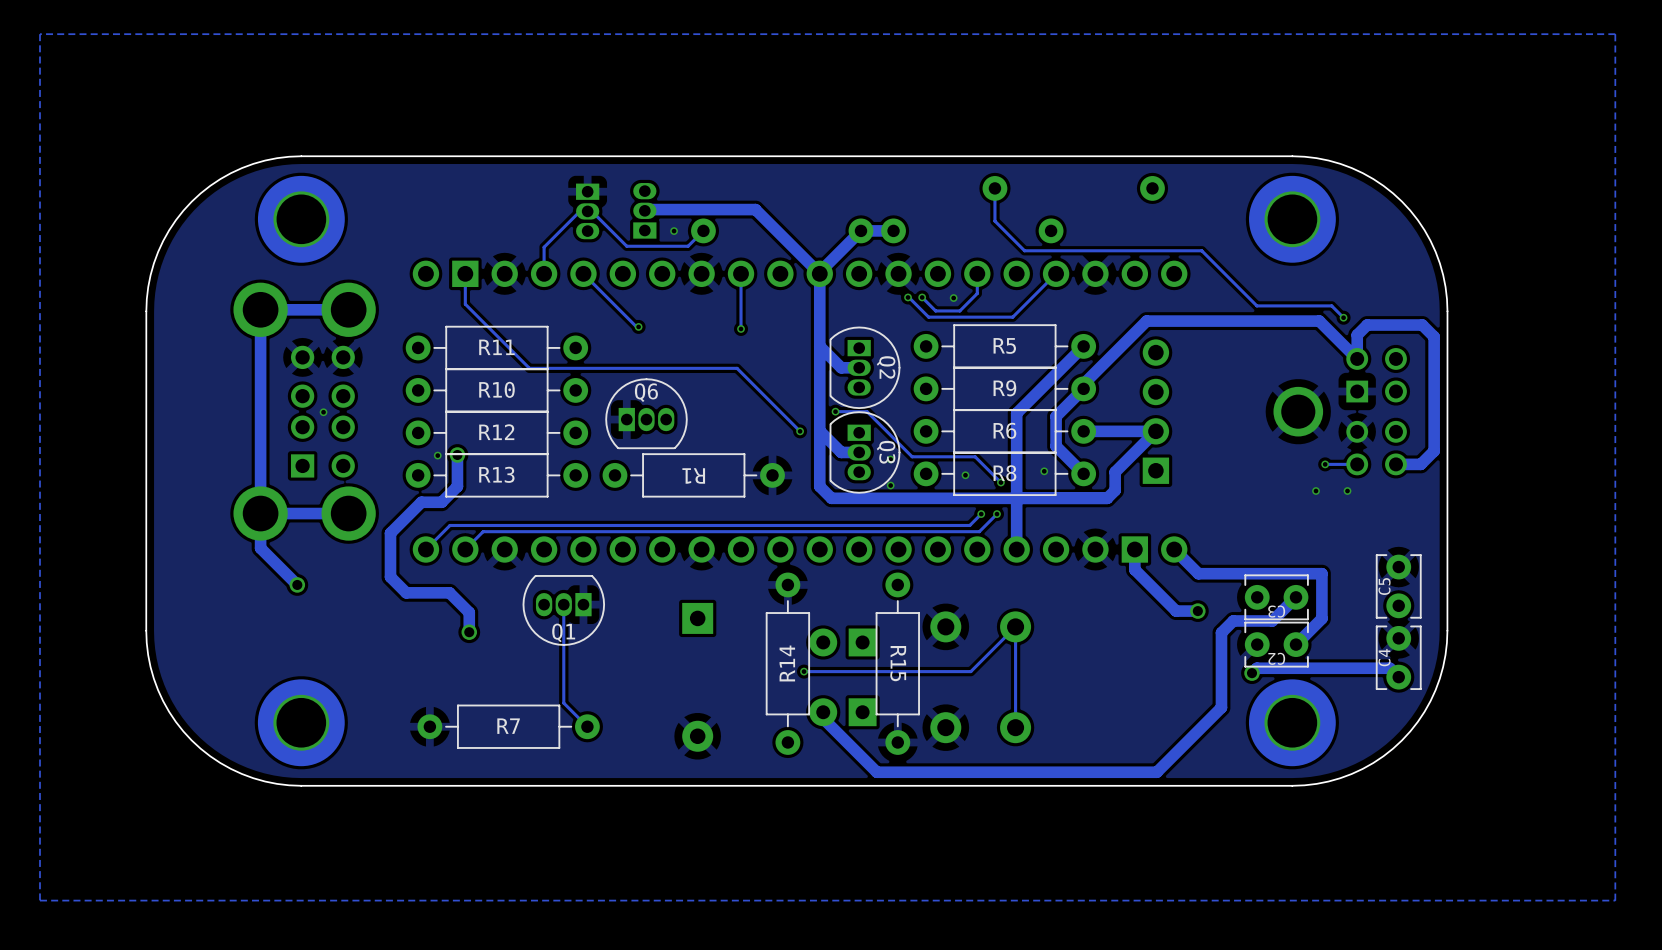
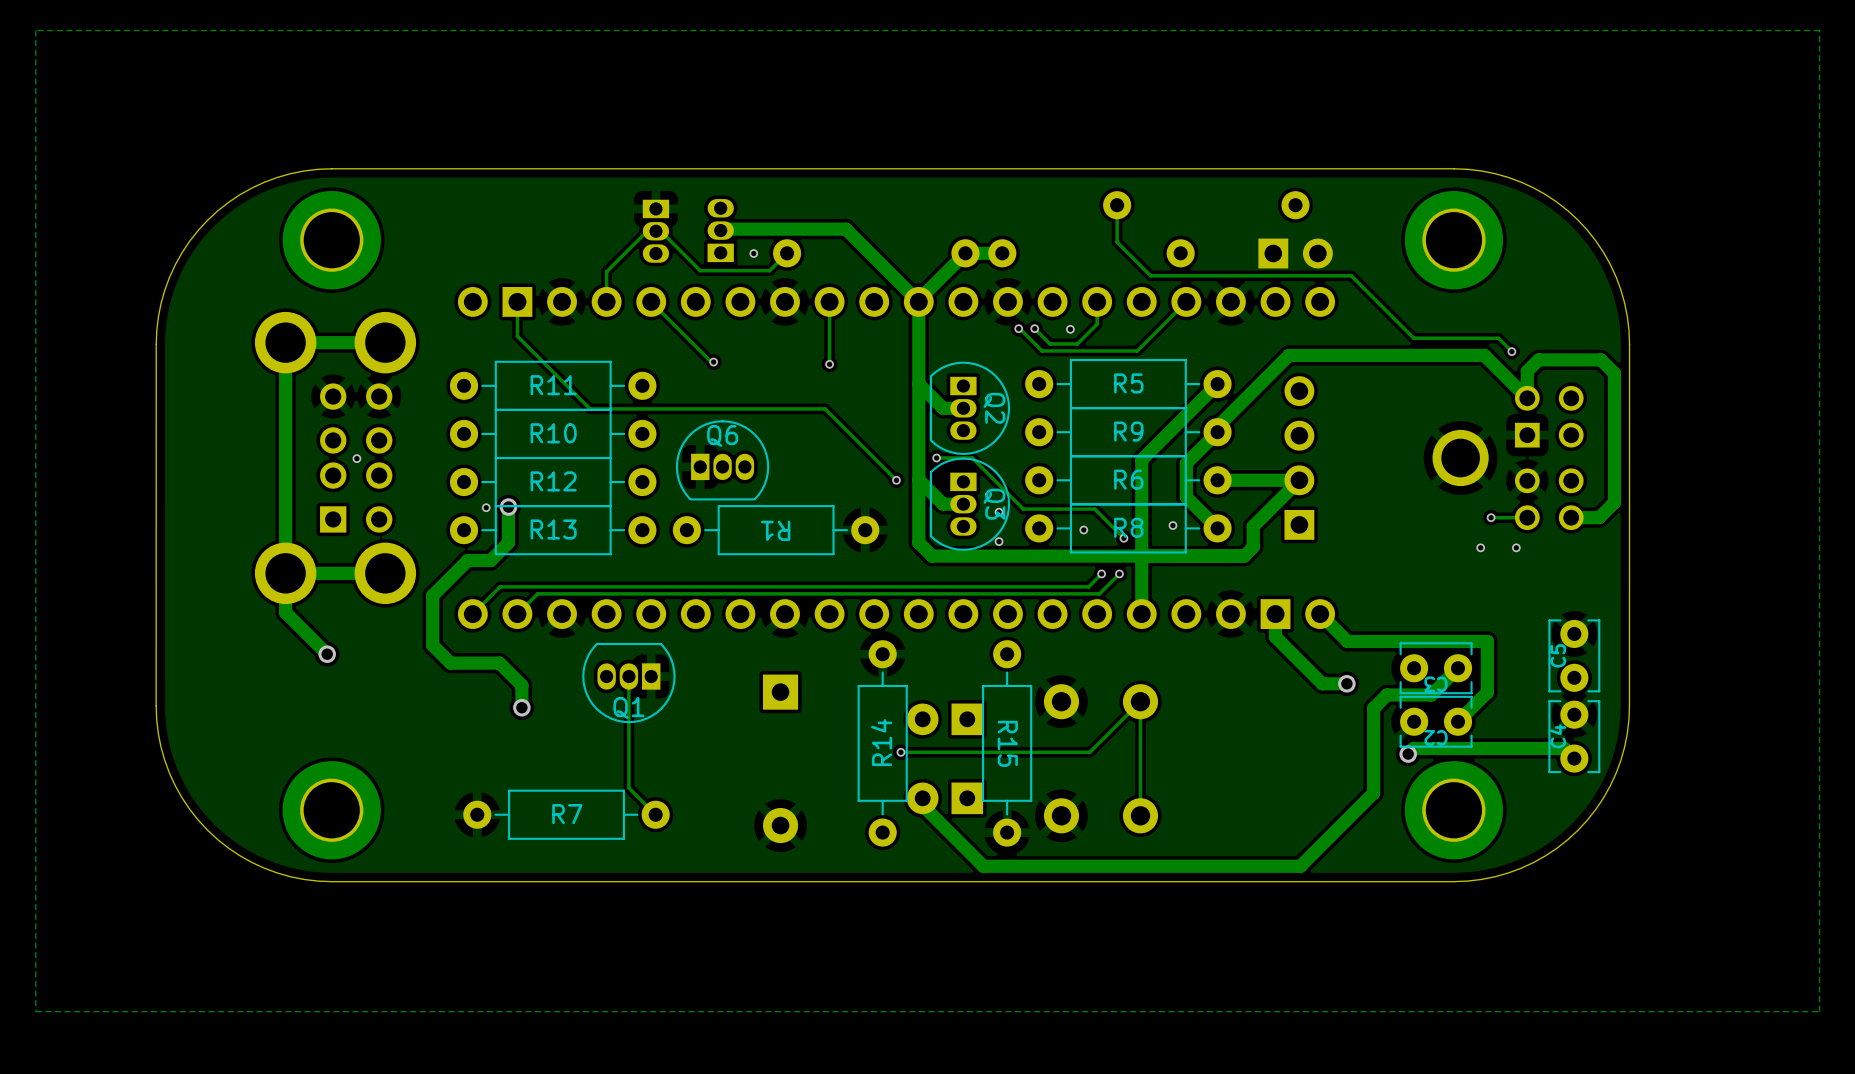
part: none -> (1295, 253)

